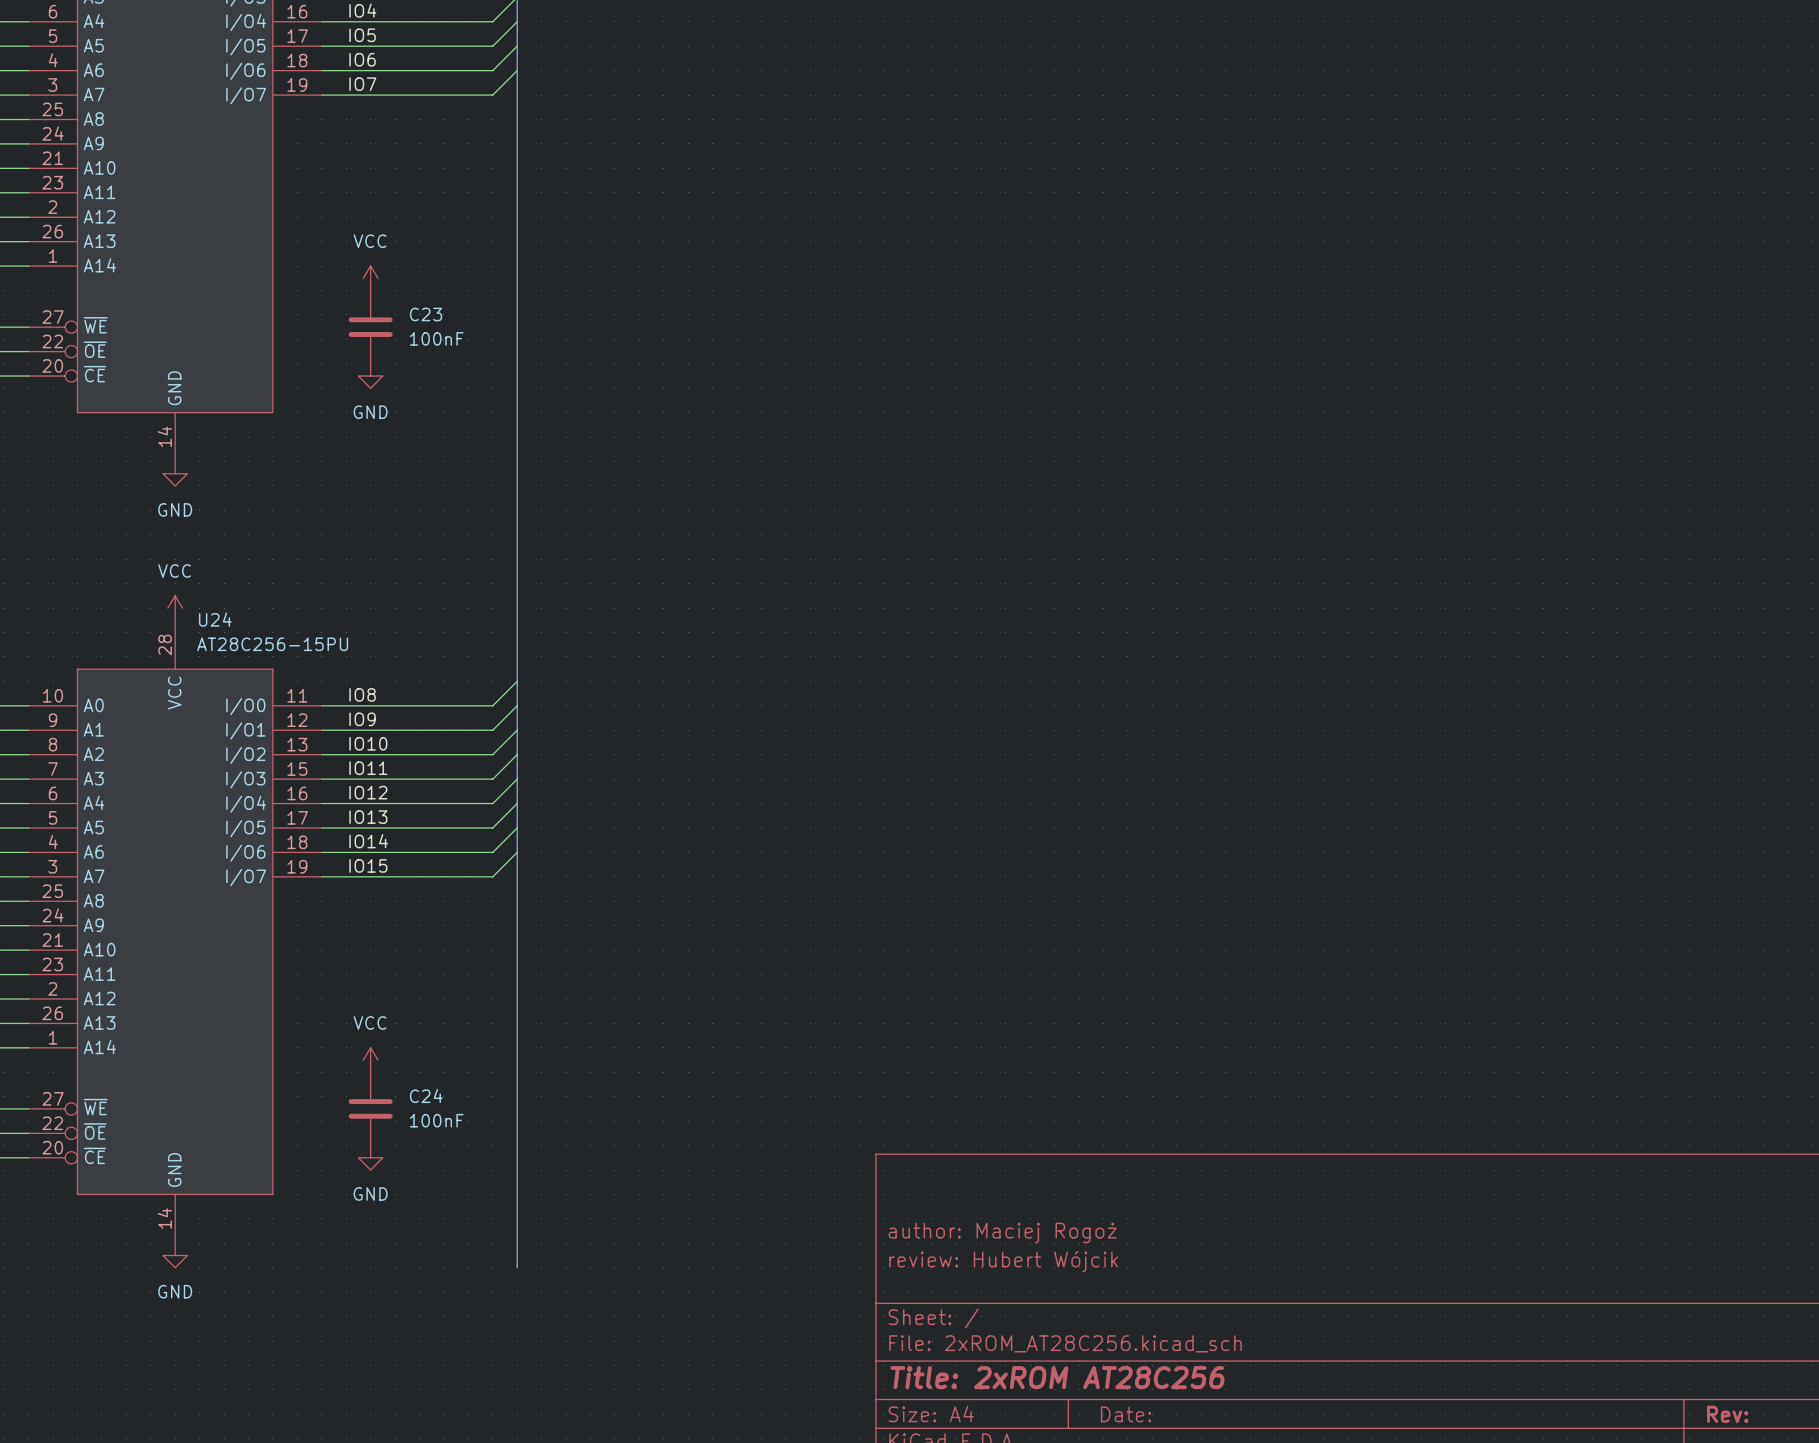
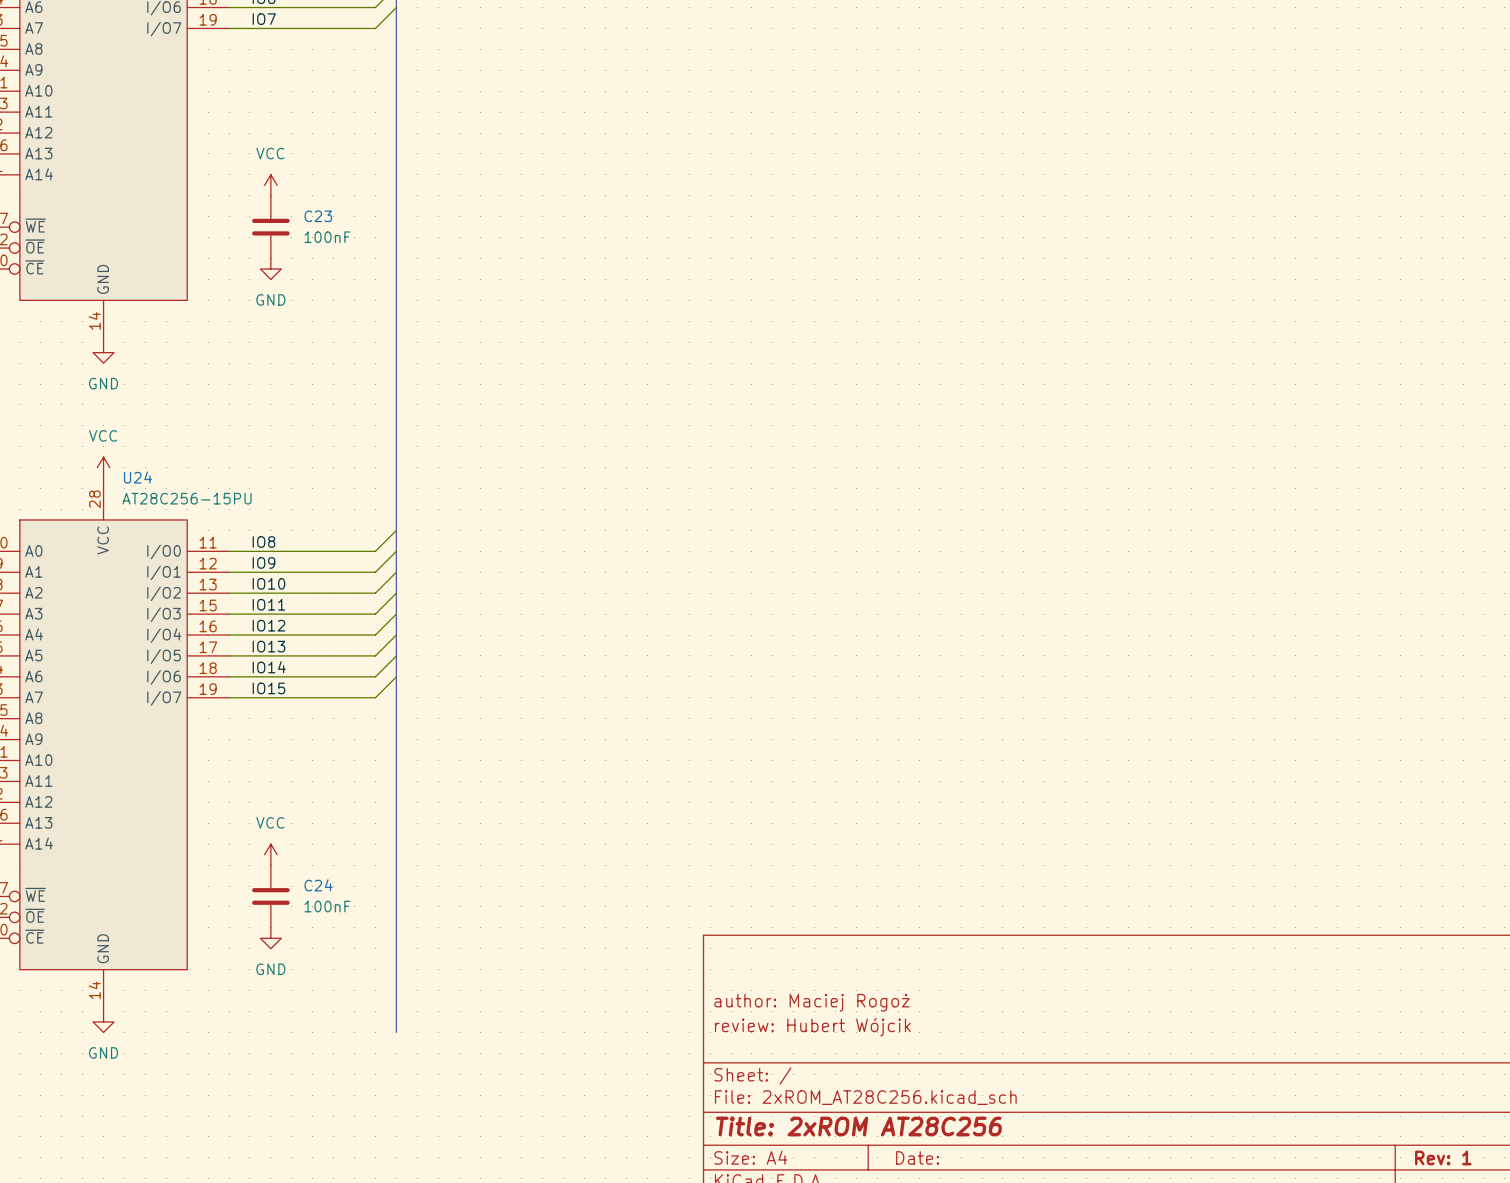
title block: Rev: (1727, 1414) -> Rev: 1 (1443, 1157)

